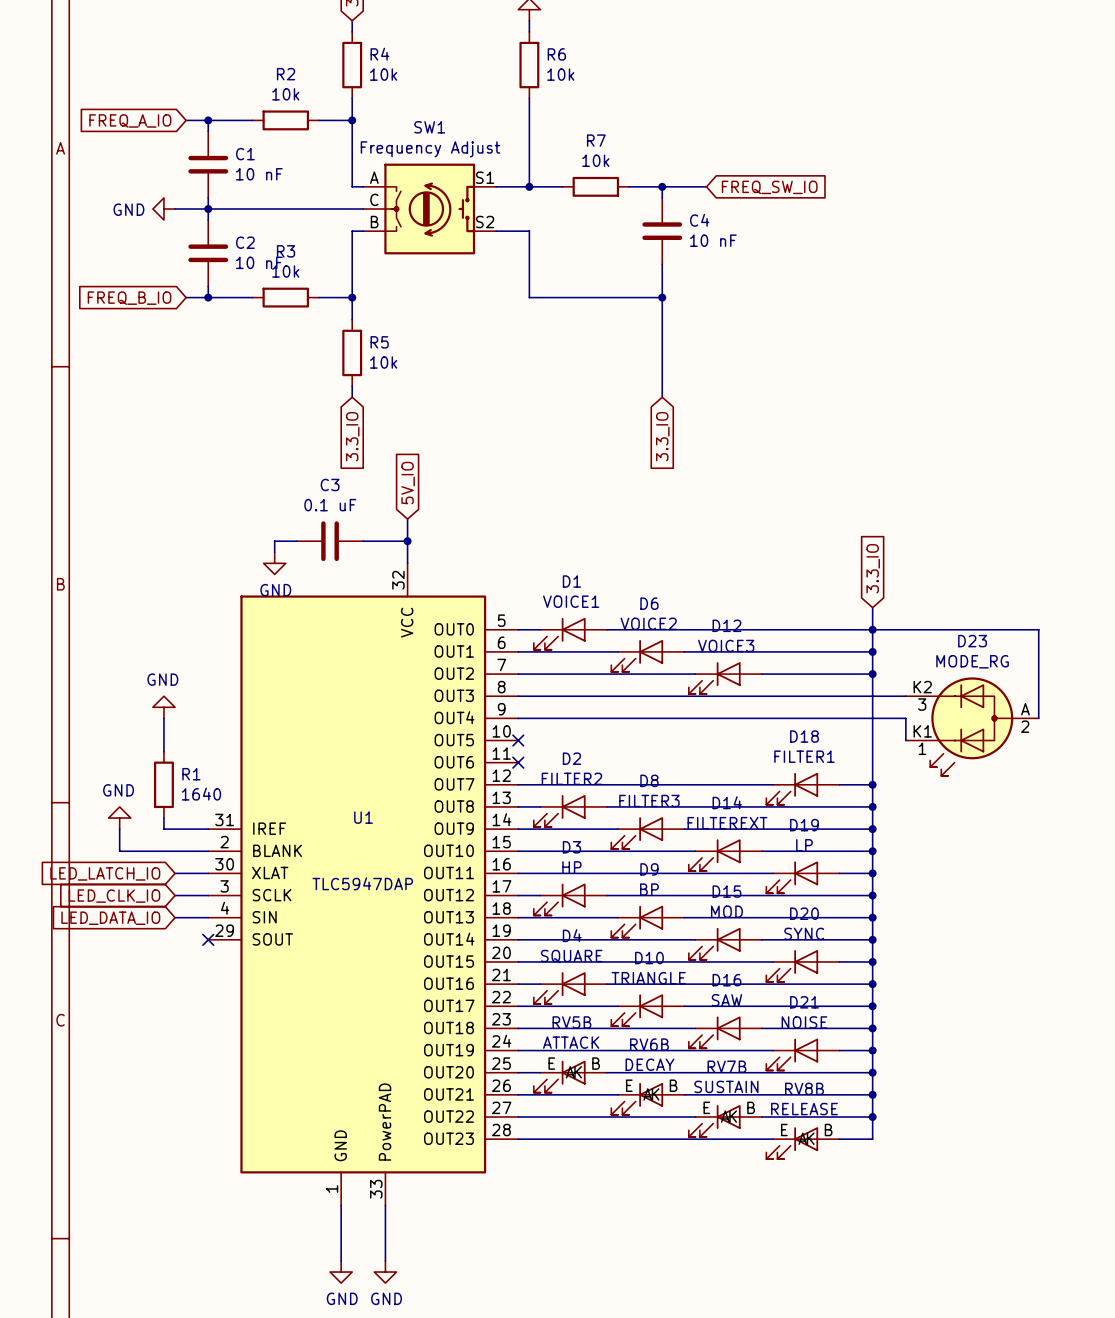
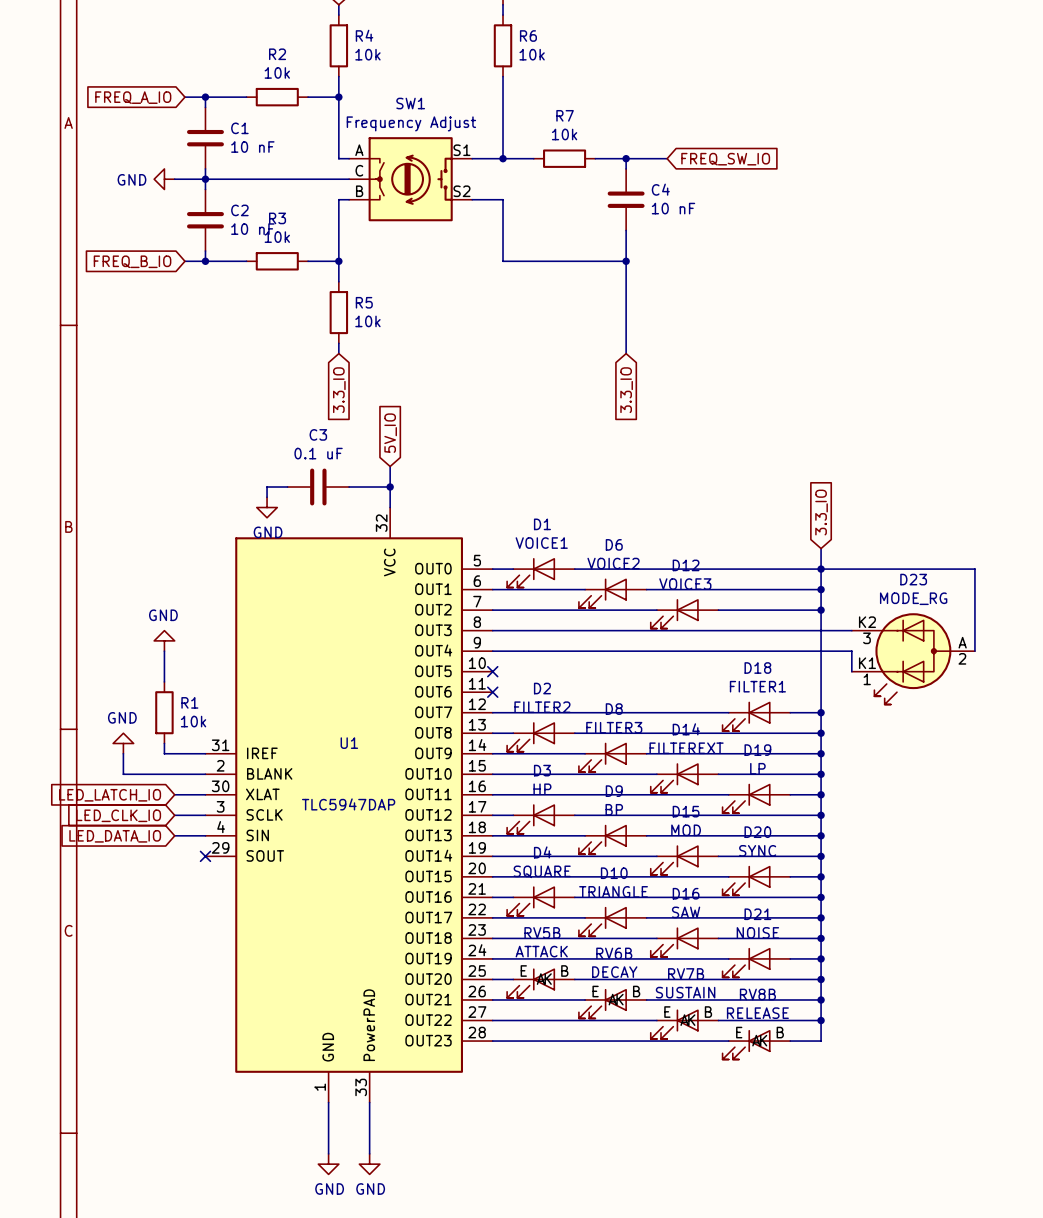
R1 value: 1640 (201, 794) -> 10k (193, 721)

